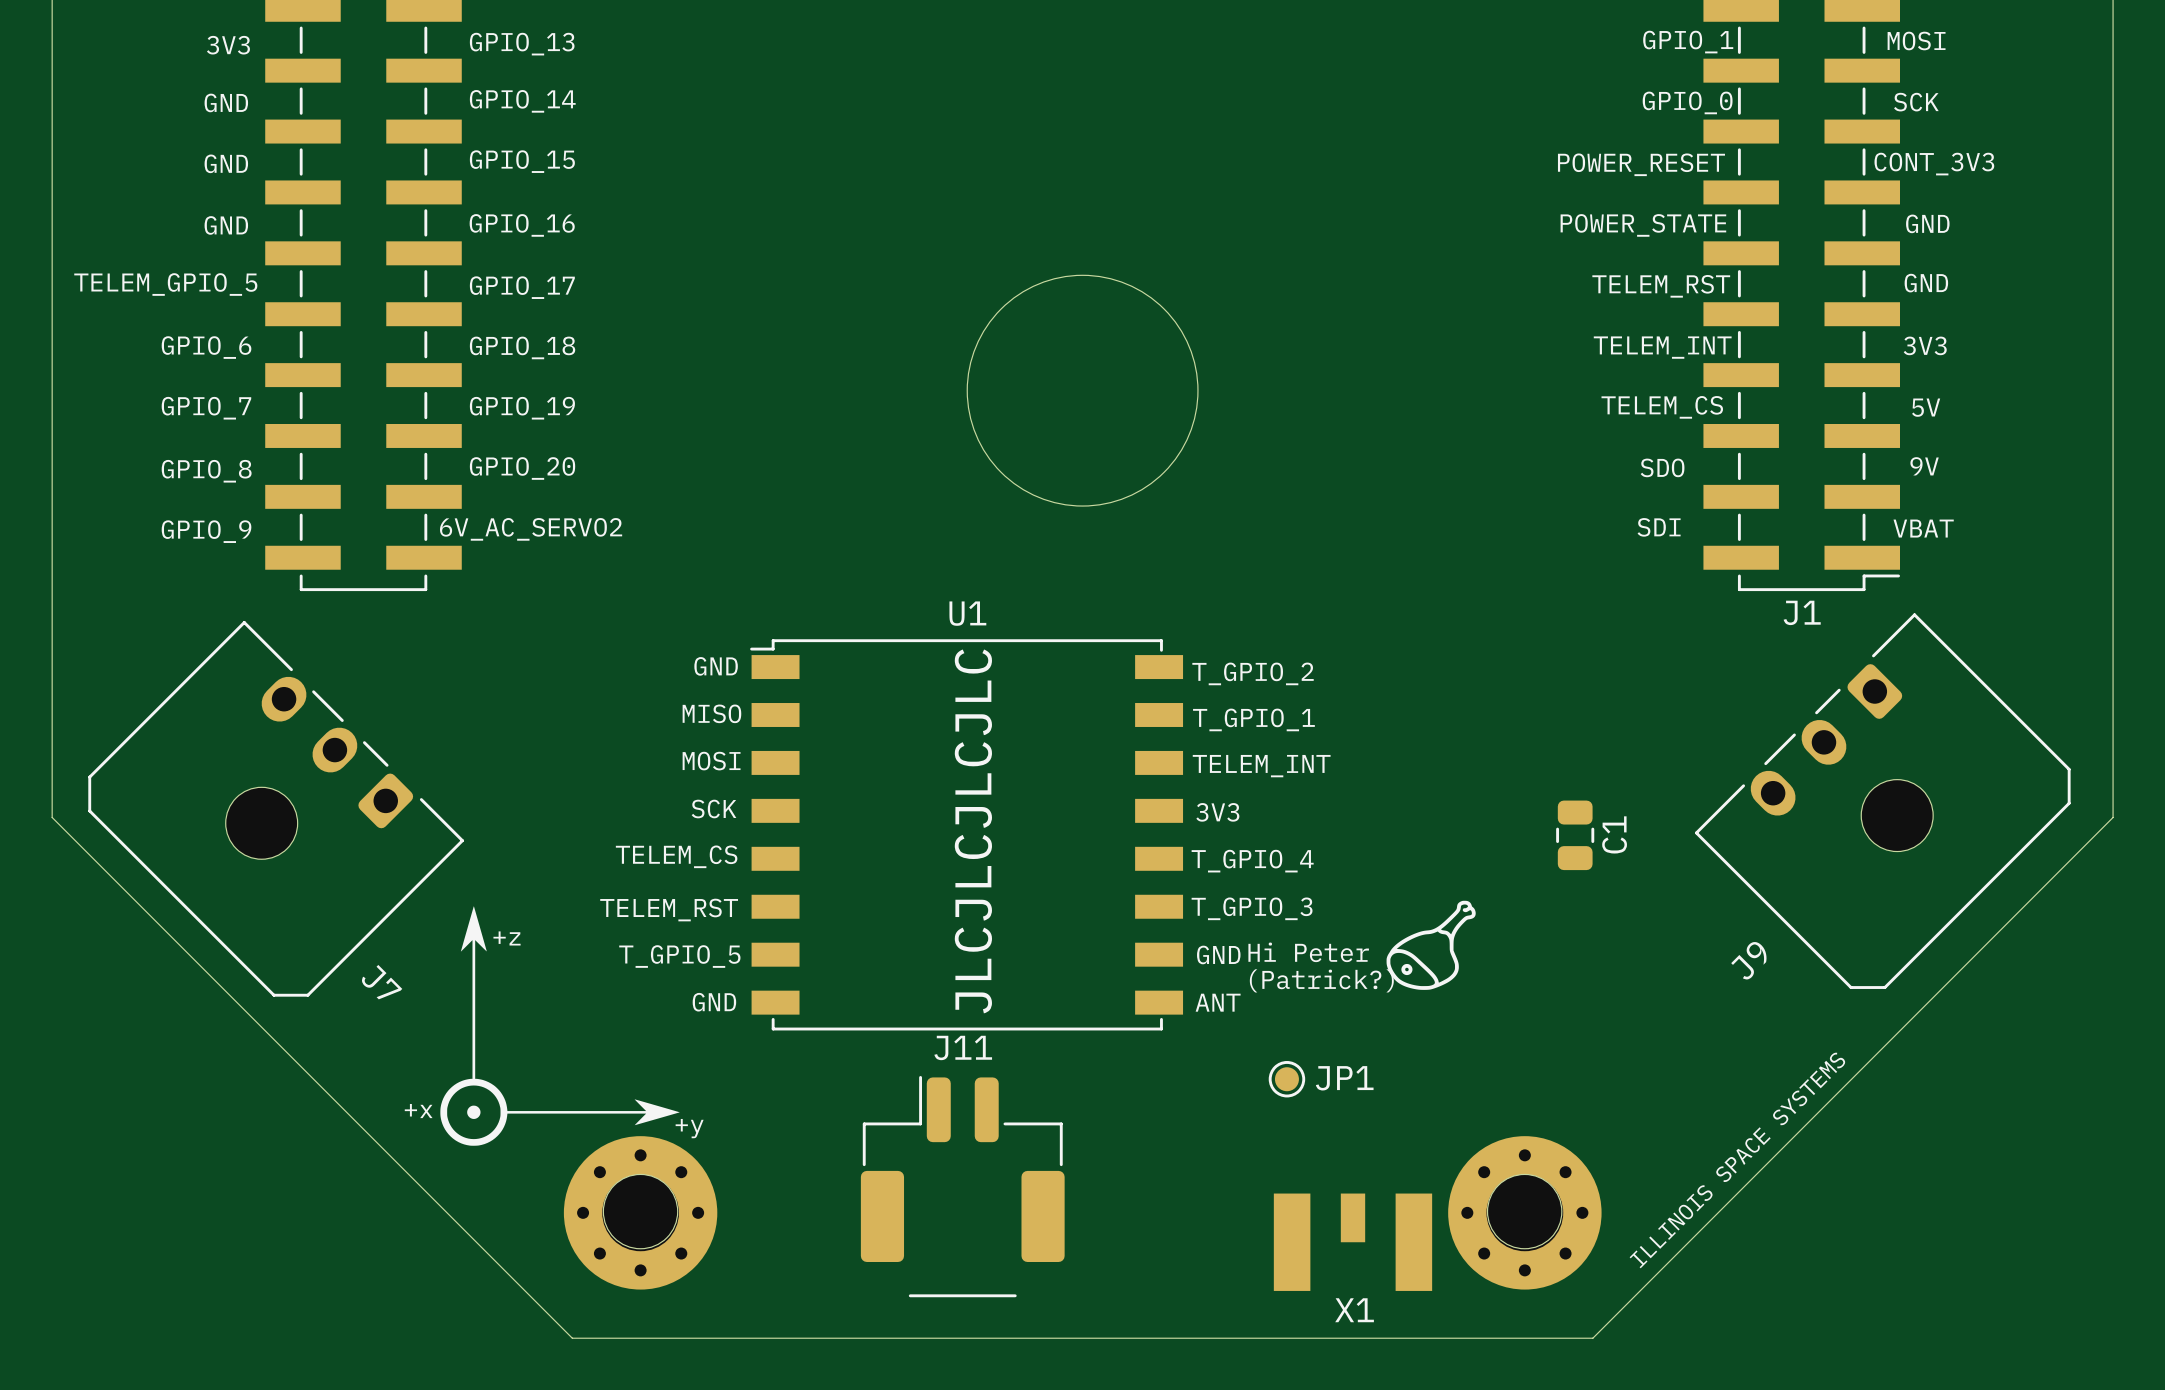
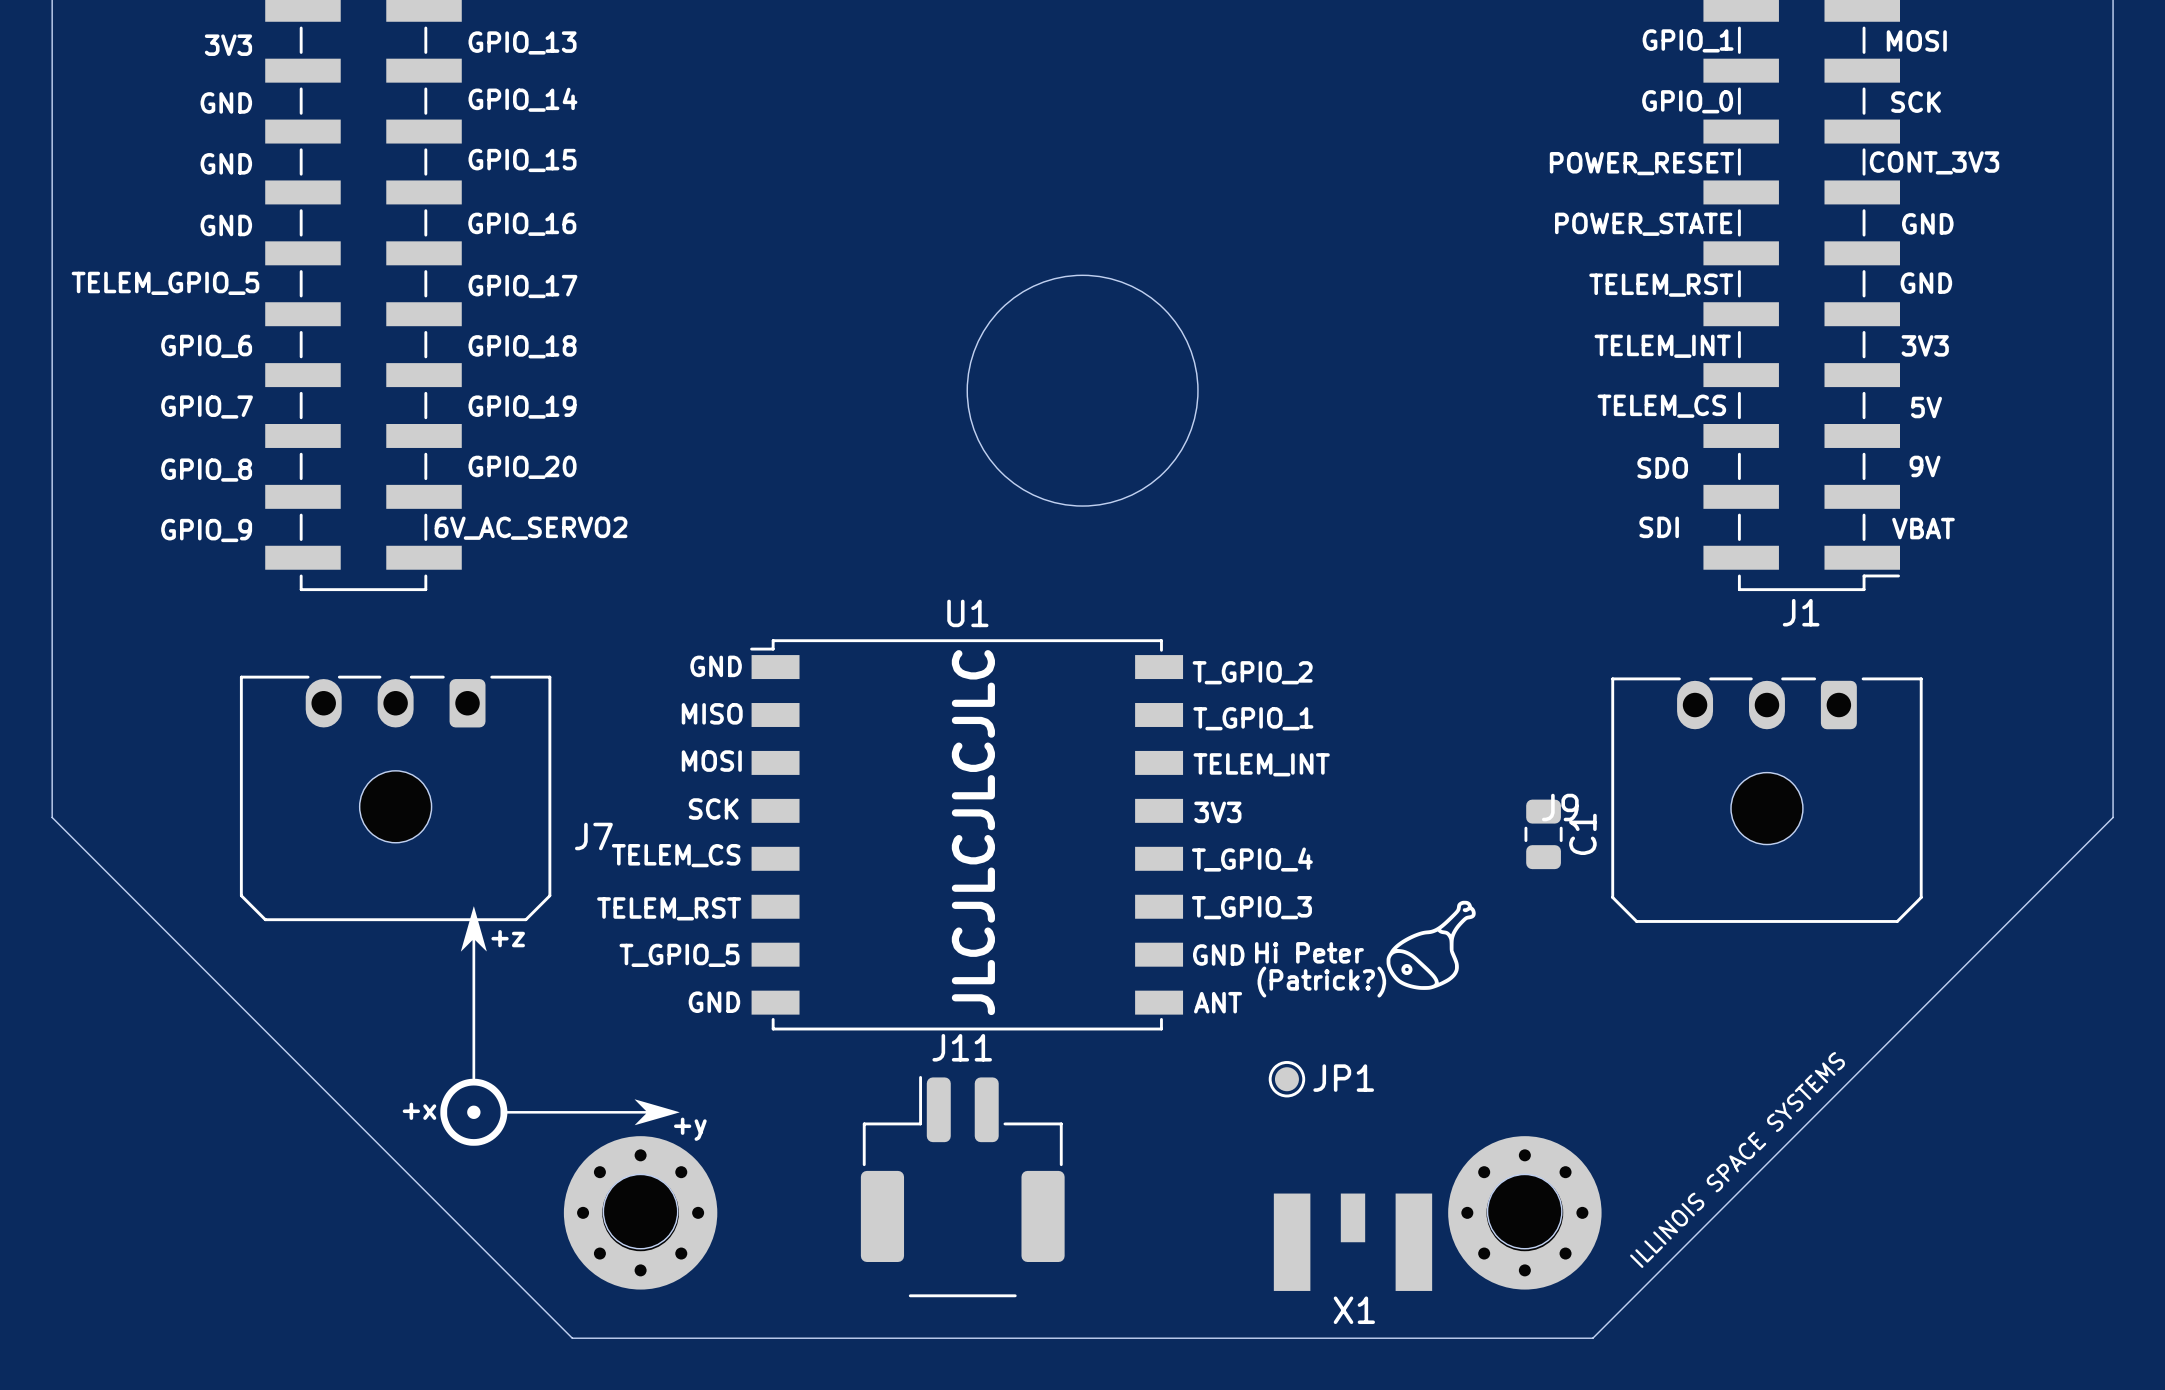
J7 footprint: [88, 621, 464, 997] -> [239, 675, 552, 922]
J9 rotation: 0° (1882, 801) -> 45° clockwise (1766, 800)
C1 position: (1575, 835) -> (1543, 834)
J7 name position: J7 (382, 982) -> J7 (593, 836)

